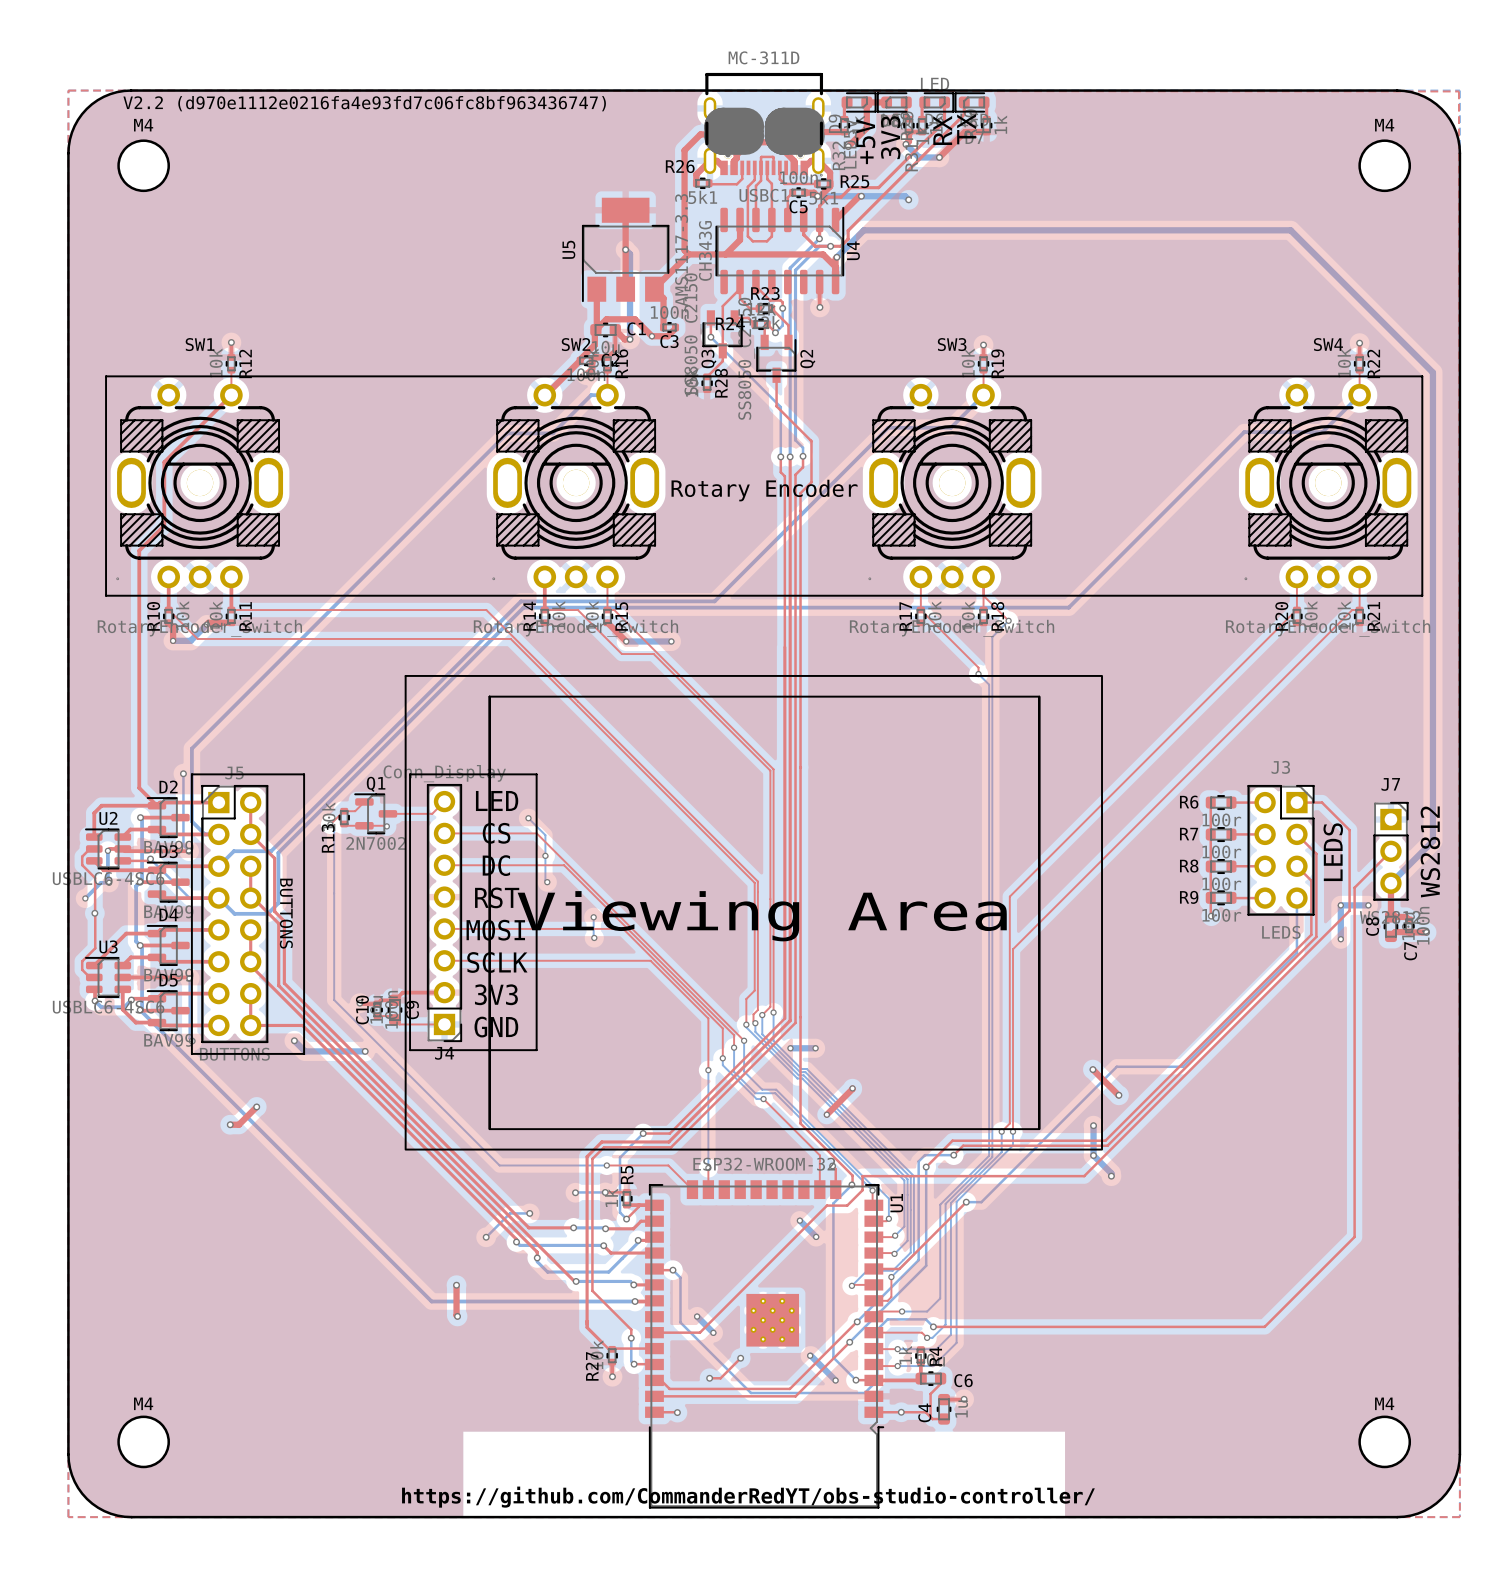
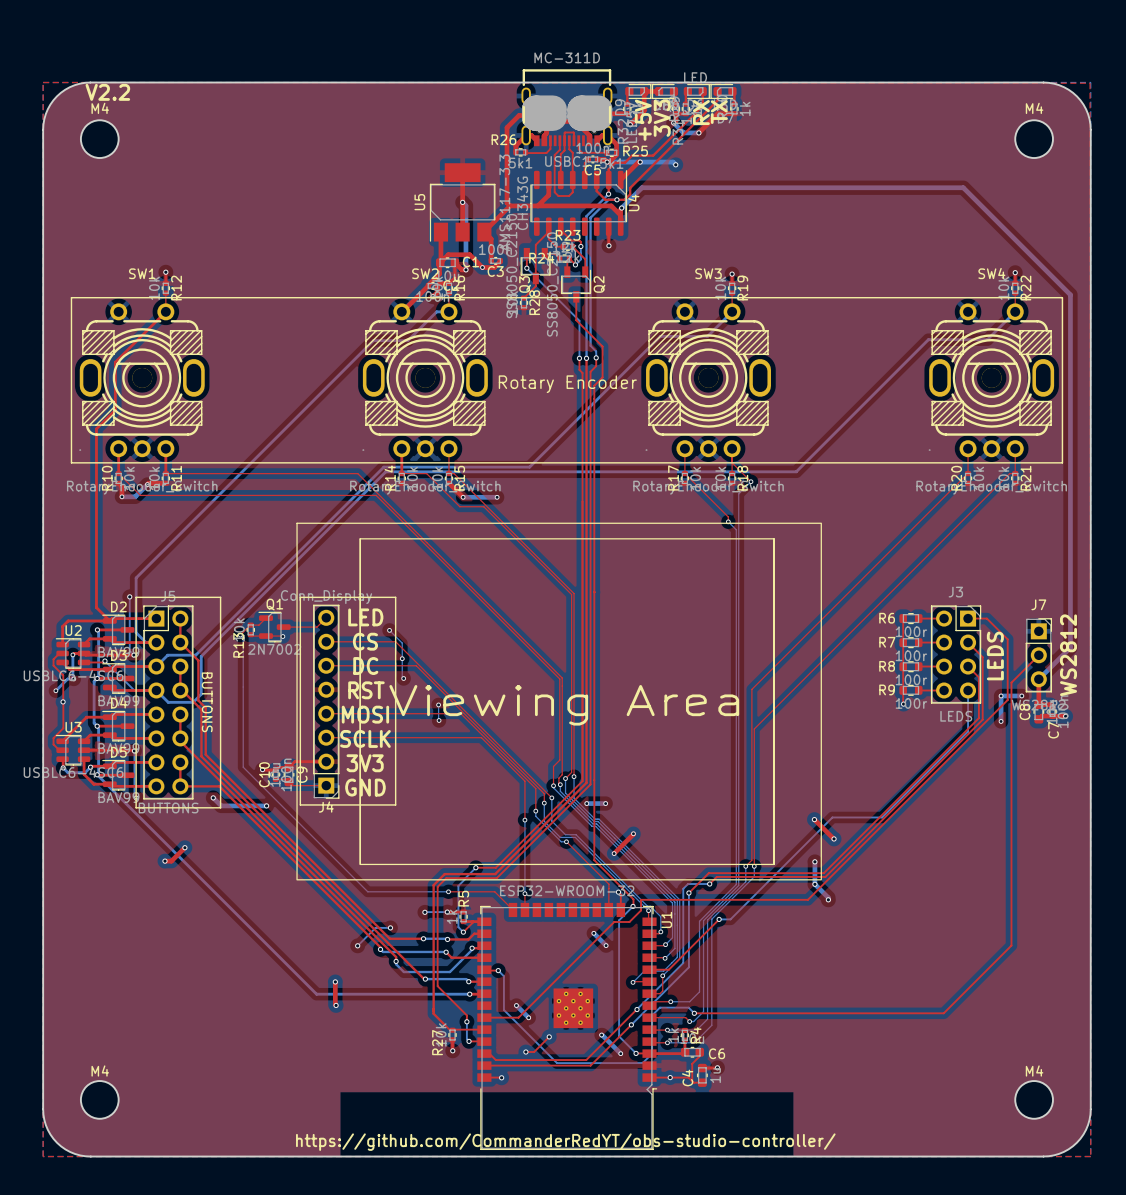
text: V2.2 (d970e1112e0216fa4e93fd7c06fc8bf963436747) (364, 103) -> V2.2 (107, 92)

